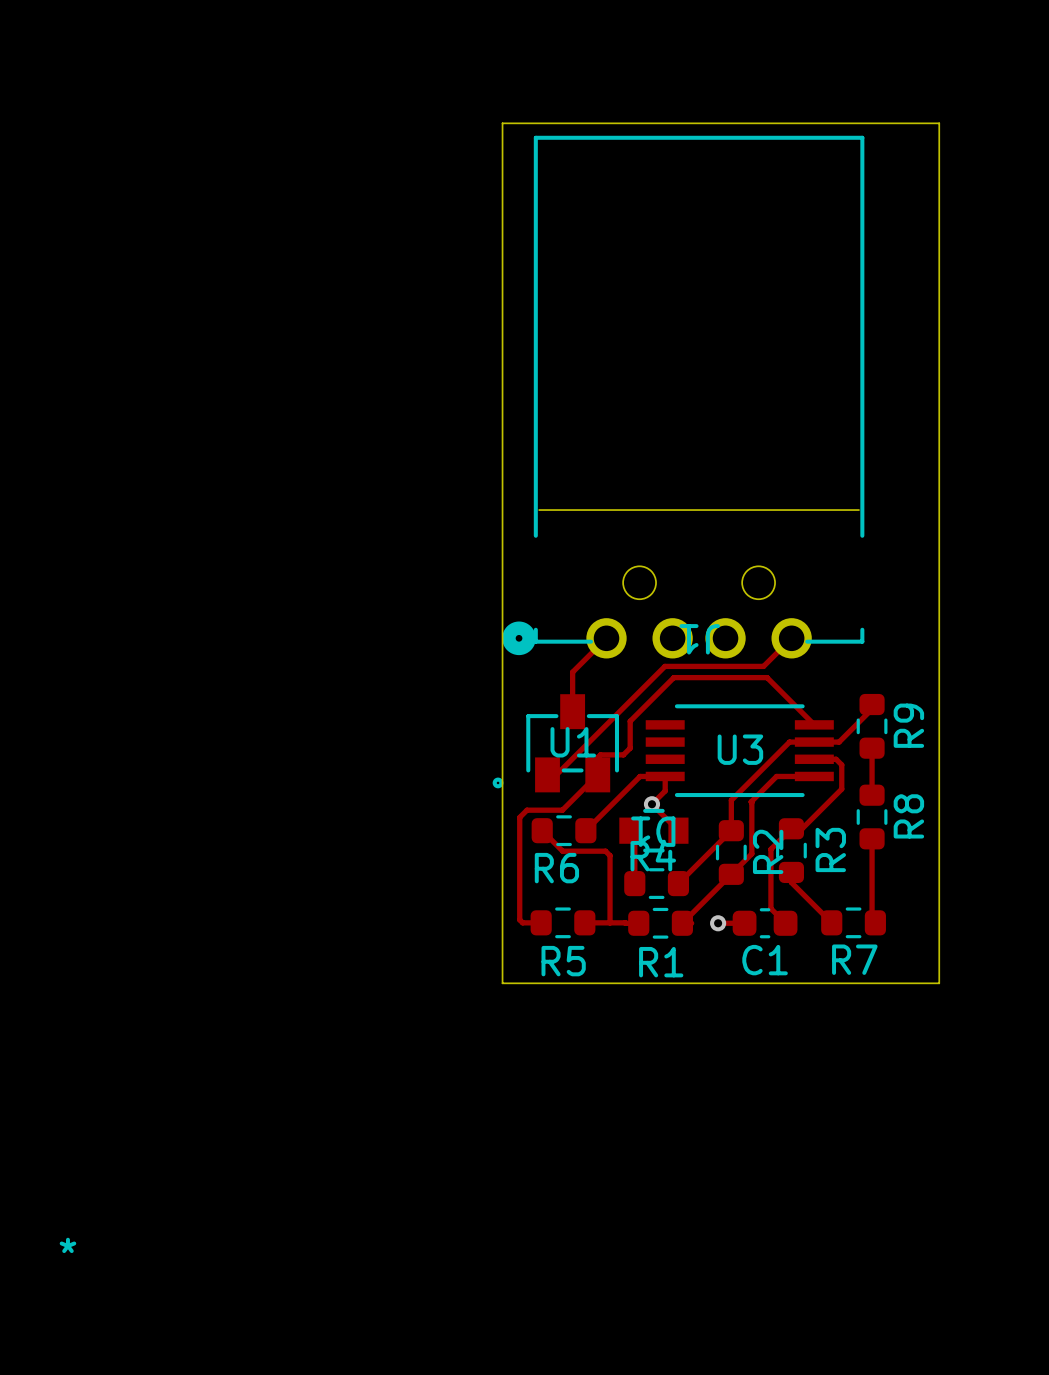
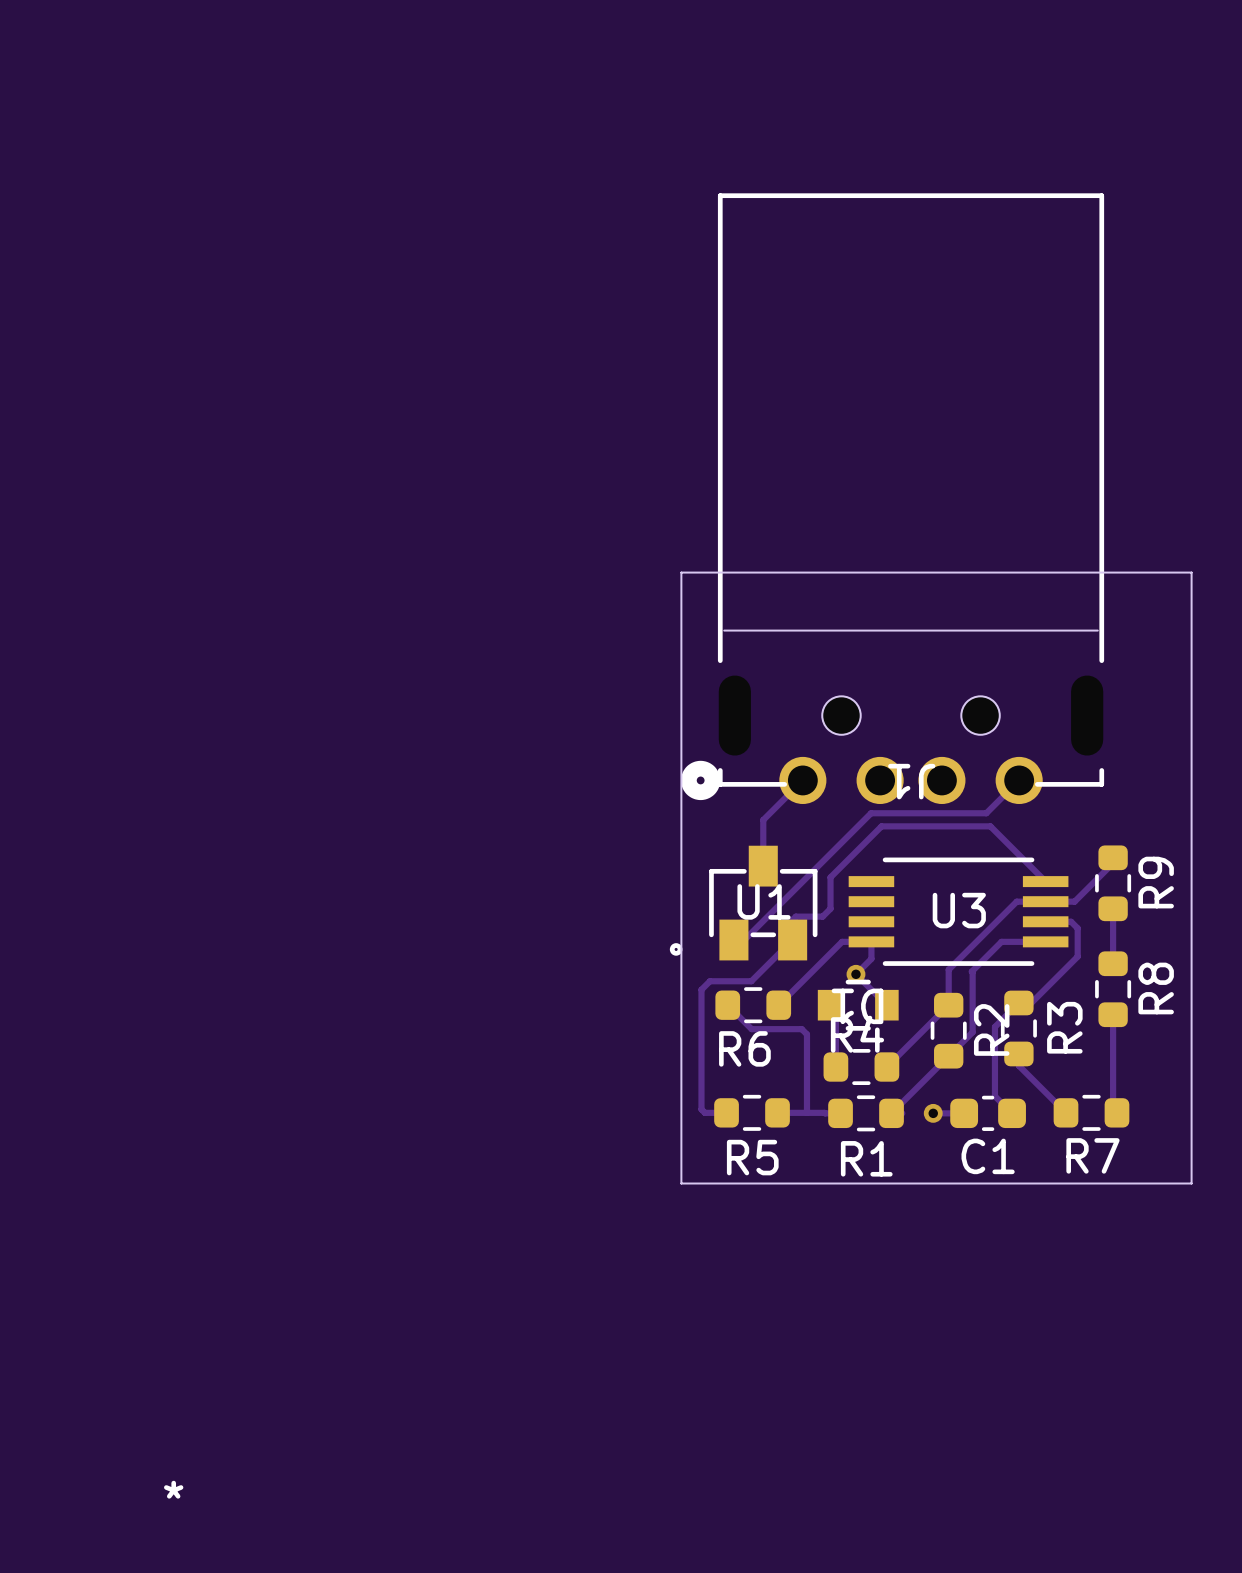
board edge: (502, 460) (502, 123) (939, 123) (939, 460) -> (681, 572) (1191, 572)

